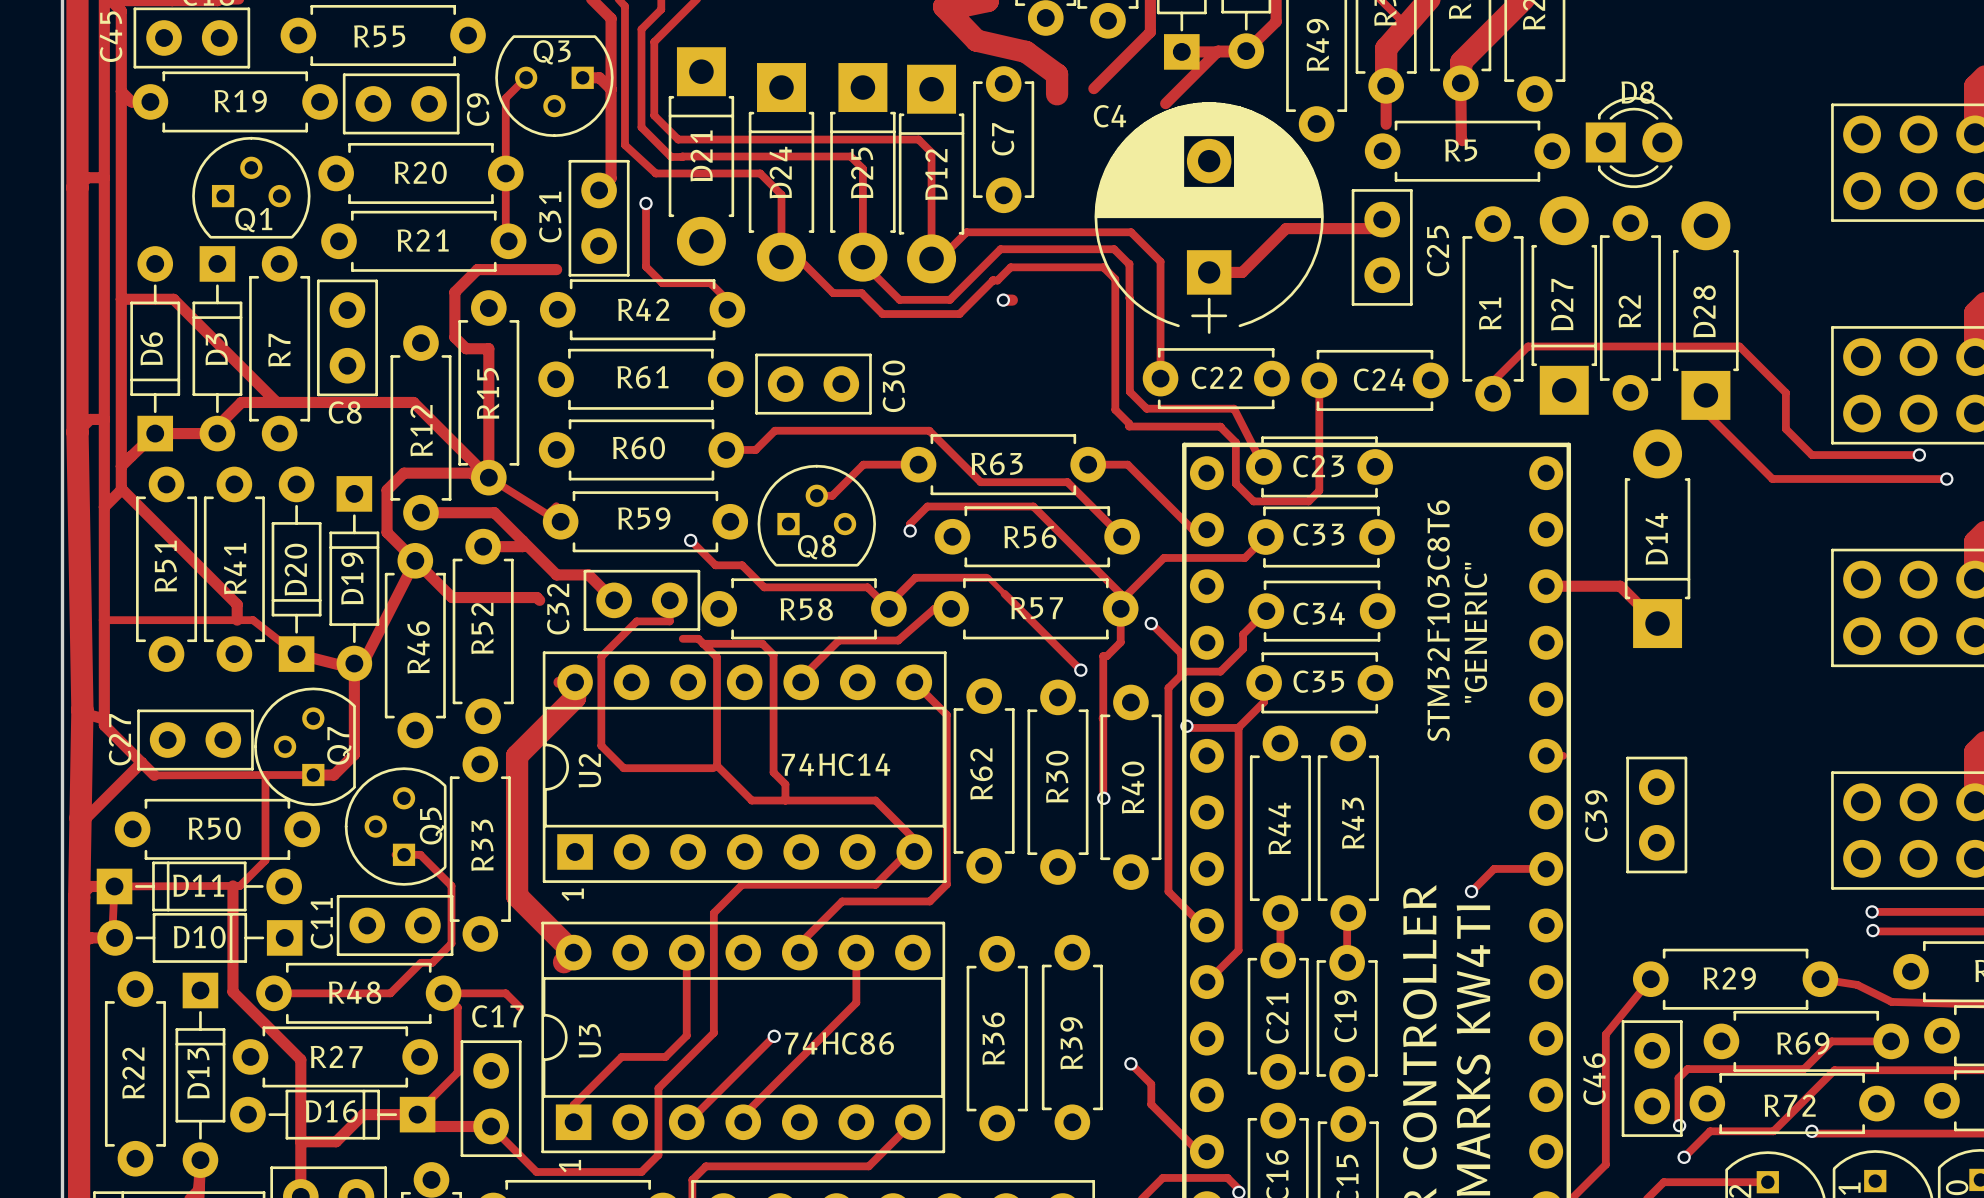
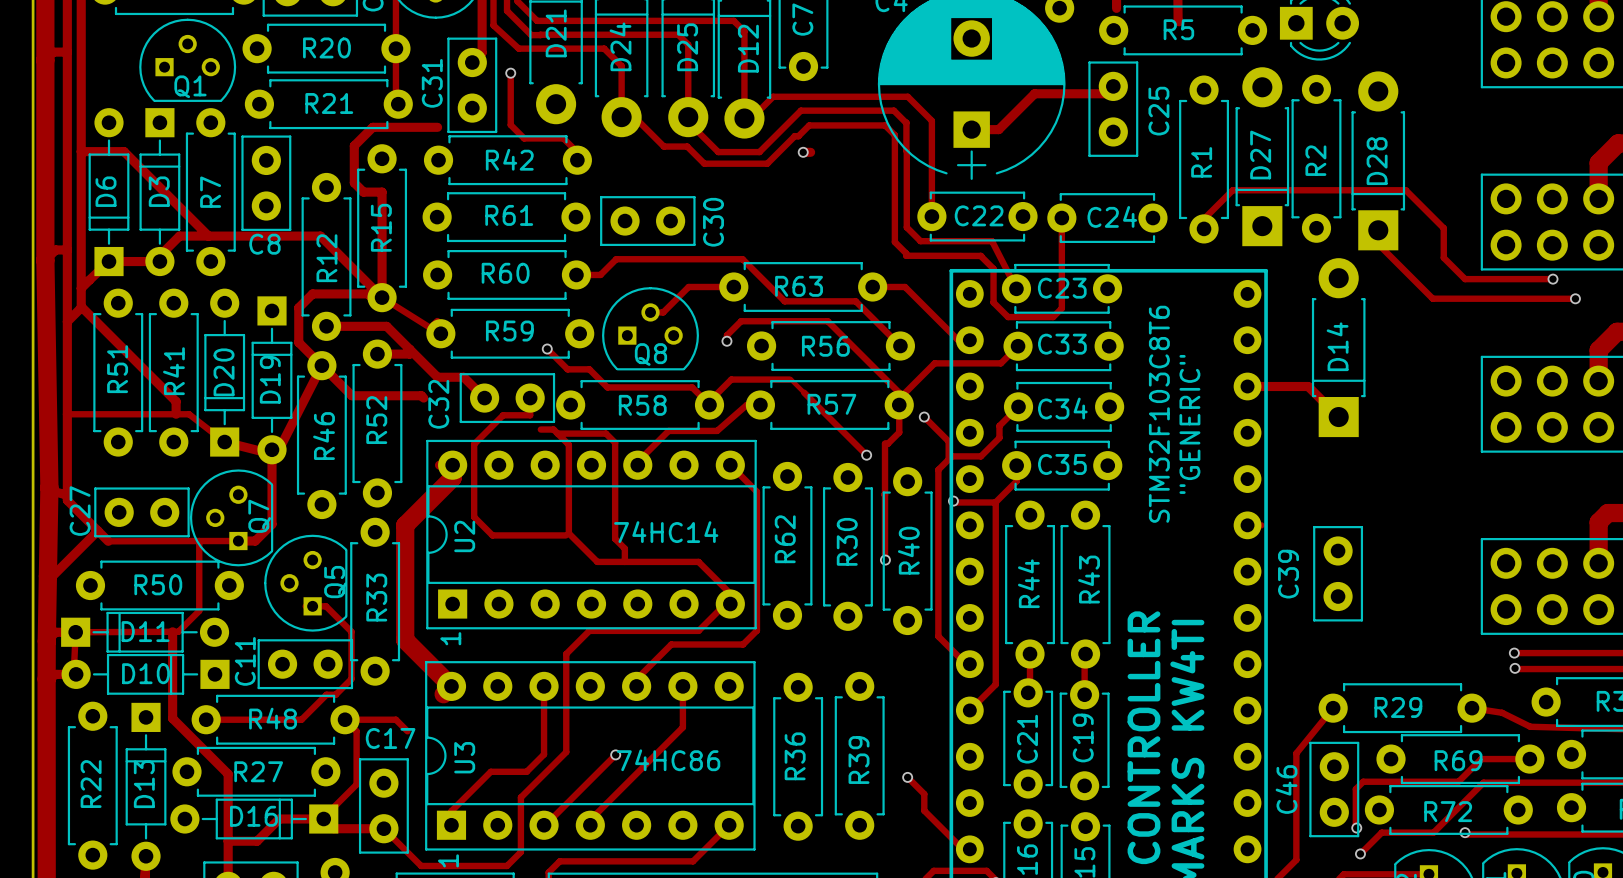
track: (1546, 868) (1494, 868) (1471, 891) -> none
via: (1471, 891) -> none

